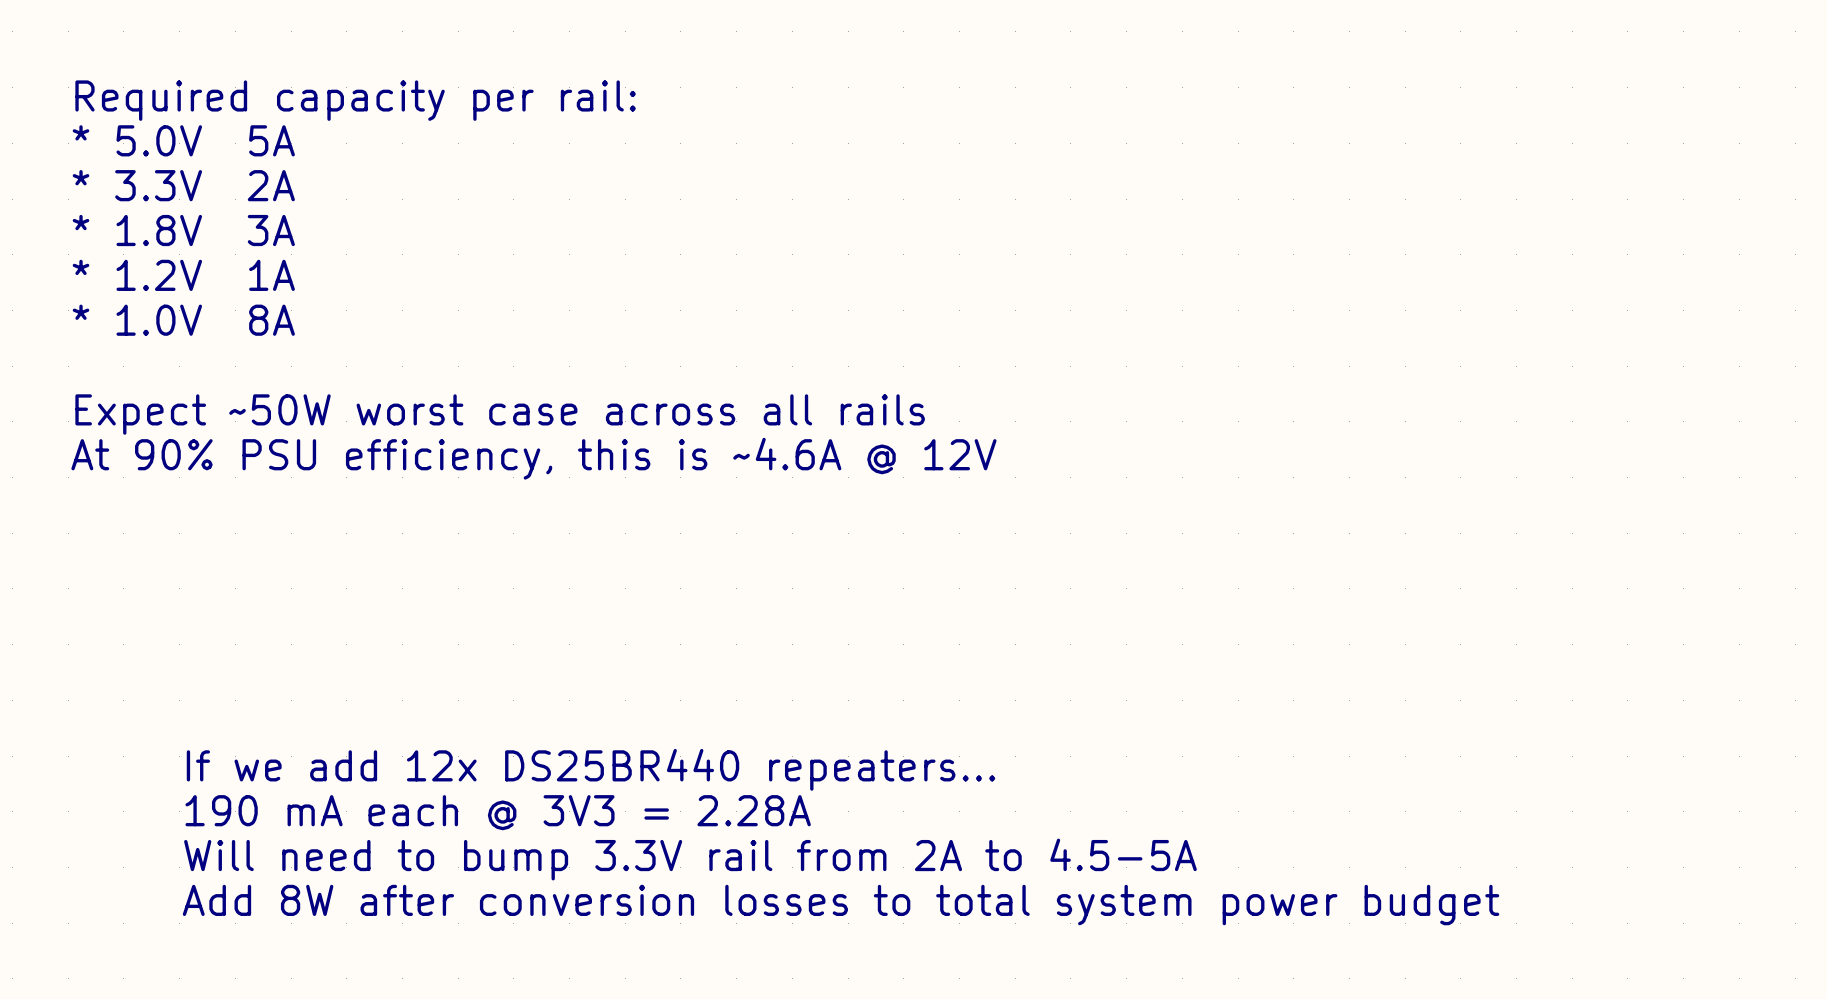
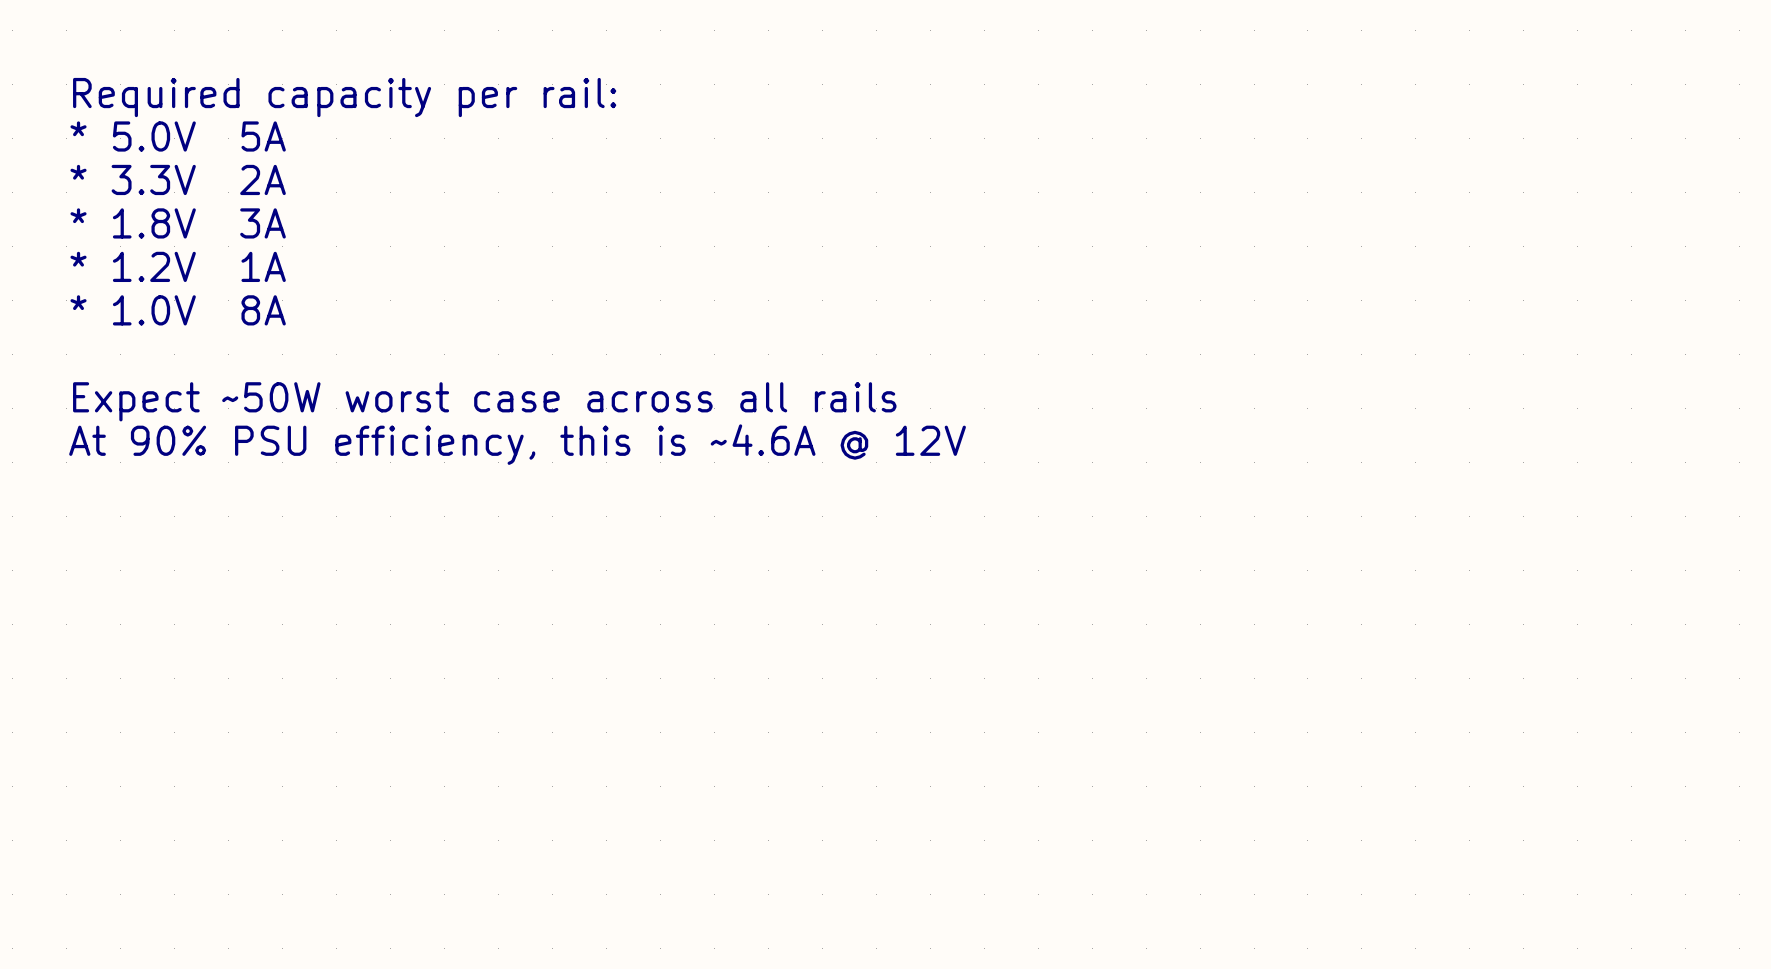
text: If we add 12x DS25BR440 repeaters... (590, 769) -> none
text: 190 mA each @ 3V3 = 2.28A (498, 812) -> none
text: Will need to bump 3.3V rail from 2A to 4.5-5A (690, 859) -> none
text: Add 8W after conversion losses to total system power budget (841, 905) -> none

